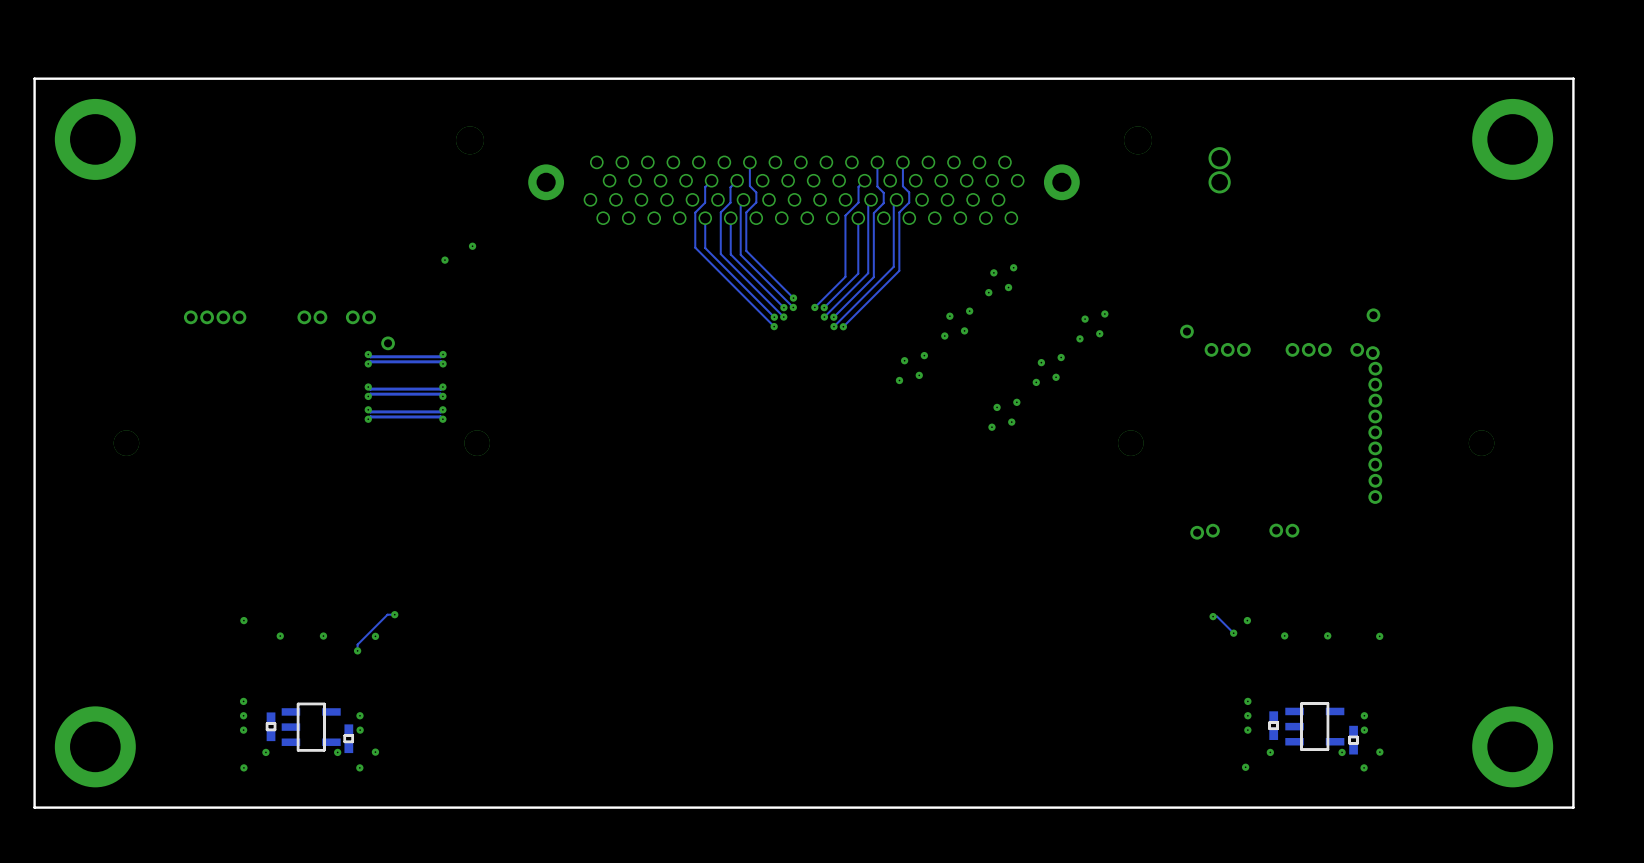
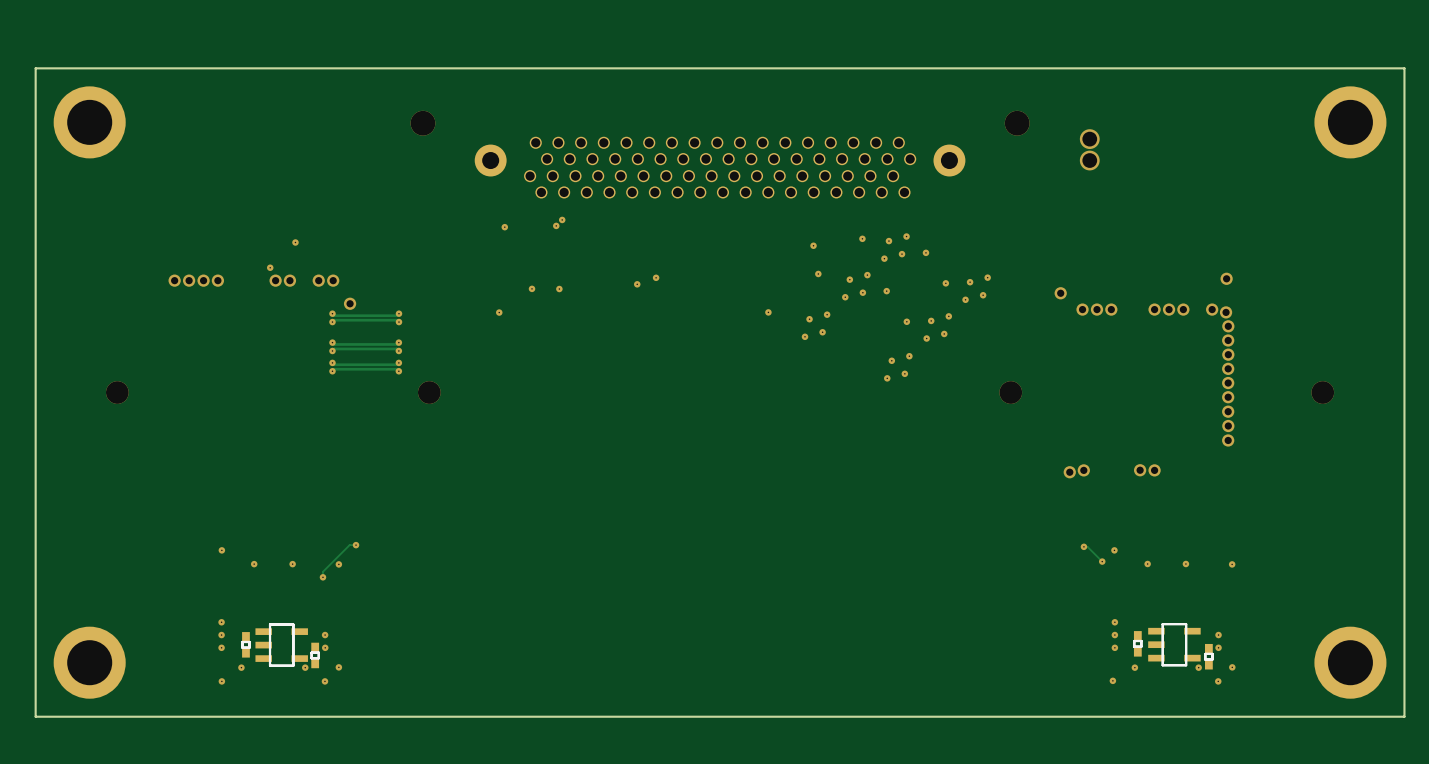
track: (749, 162) (749, 186) (756, 192) (756, 202) (746, 212) (746, 250) (793, 298) -> none
track: (877, 162) (877, 186) (883, 192) (883, 203) (873, 213) (873, 277) (833, 317) -> none
track: (902, 162) (902, 186) (909, 192) (909, 202) (899, 212) (899, 270) (843, 326) -> none
track: (711, 180) (705, 187) (705, 202) (695, 212) (695, 247) (774, 326) -> none
track: (737, 180) (730, 187) (730, 202) (720, 212) (720, 254) (783, 317) -> none
track: (864, 180) (858, 186) (858, 202) (845, 215) (845, 276) (814, 307) -> none
track: (743, 199) (740, 202) (740, 254) (793, 307) -> none
track: (871, 199) (868, 202) (868, 273) (824, 317) -> none
track: (896, 199) (893, 202) (893, 266) (833, 326) -> none
track: (705, 218) (705, 248) (774, 317) -> none
track: (730, 218) (730, 254) (783, 307) -> none
track: (858, 218) (858, 273) (824, 307) -> none
via: (472, 246) -> none
via: none -> (562, 219)
via: none -> (556, 225)
via: none -> (504, 227)
via: (444, 260) -> none
via: none -> (862, 238)
via: none -> (295, 242)
via: none -> (813, 245)
via: none -> (925, 252)
via: (793, 298) -> none
via: none -> (270, 267)
via: (783, 307) -> none
via: (793, 307) -> none
via: (814, 307) -> none
via: (824, 307) -> none
via: none -> (818, 273)
via: none -> (656, 277)
via: (774, 317) -> none
via: (783, 317) -> none
via: (824, 317) -> none
via: (833, 317) -> none
via: none -> (945, 283)
via: none -> (637, 284)
via: none -> (532, 288)
via: none -> (559, 289)
via: (774, 326) -> none
via: (833, 326) -> none
via: (843, 326) -> none
via: none -> (886, 291)
via: none -> (499, 312)
via: none -> (768, 312)
via: none -> (906, 321)

